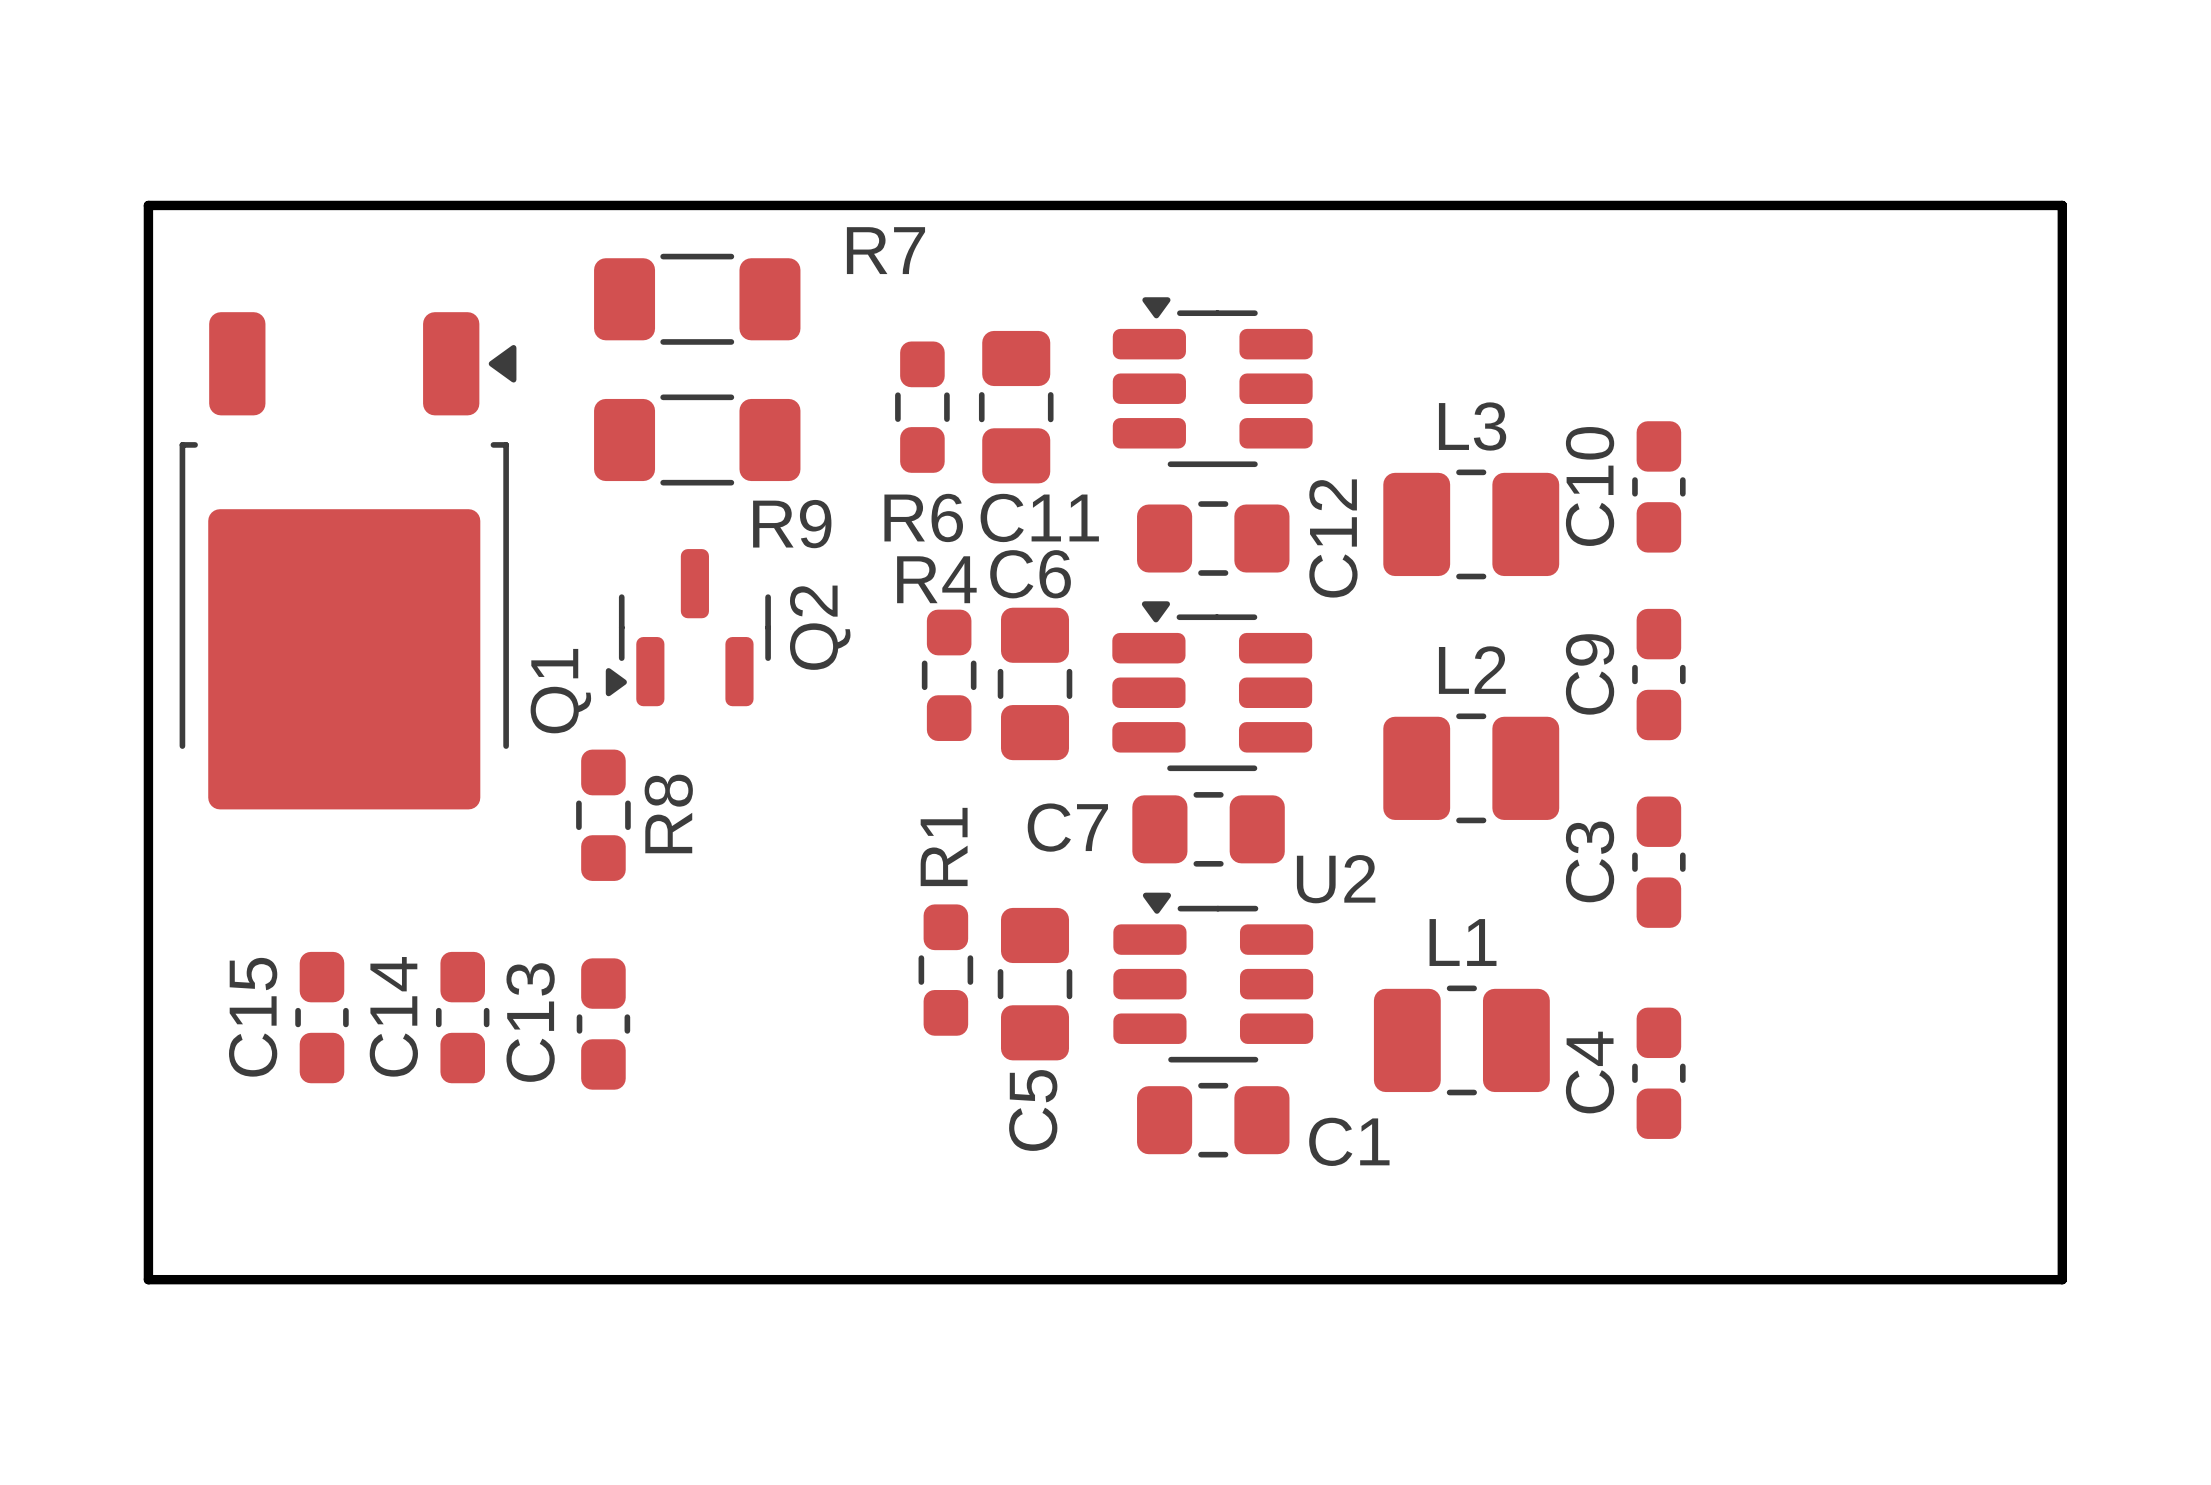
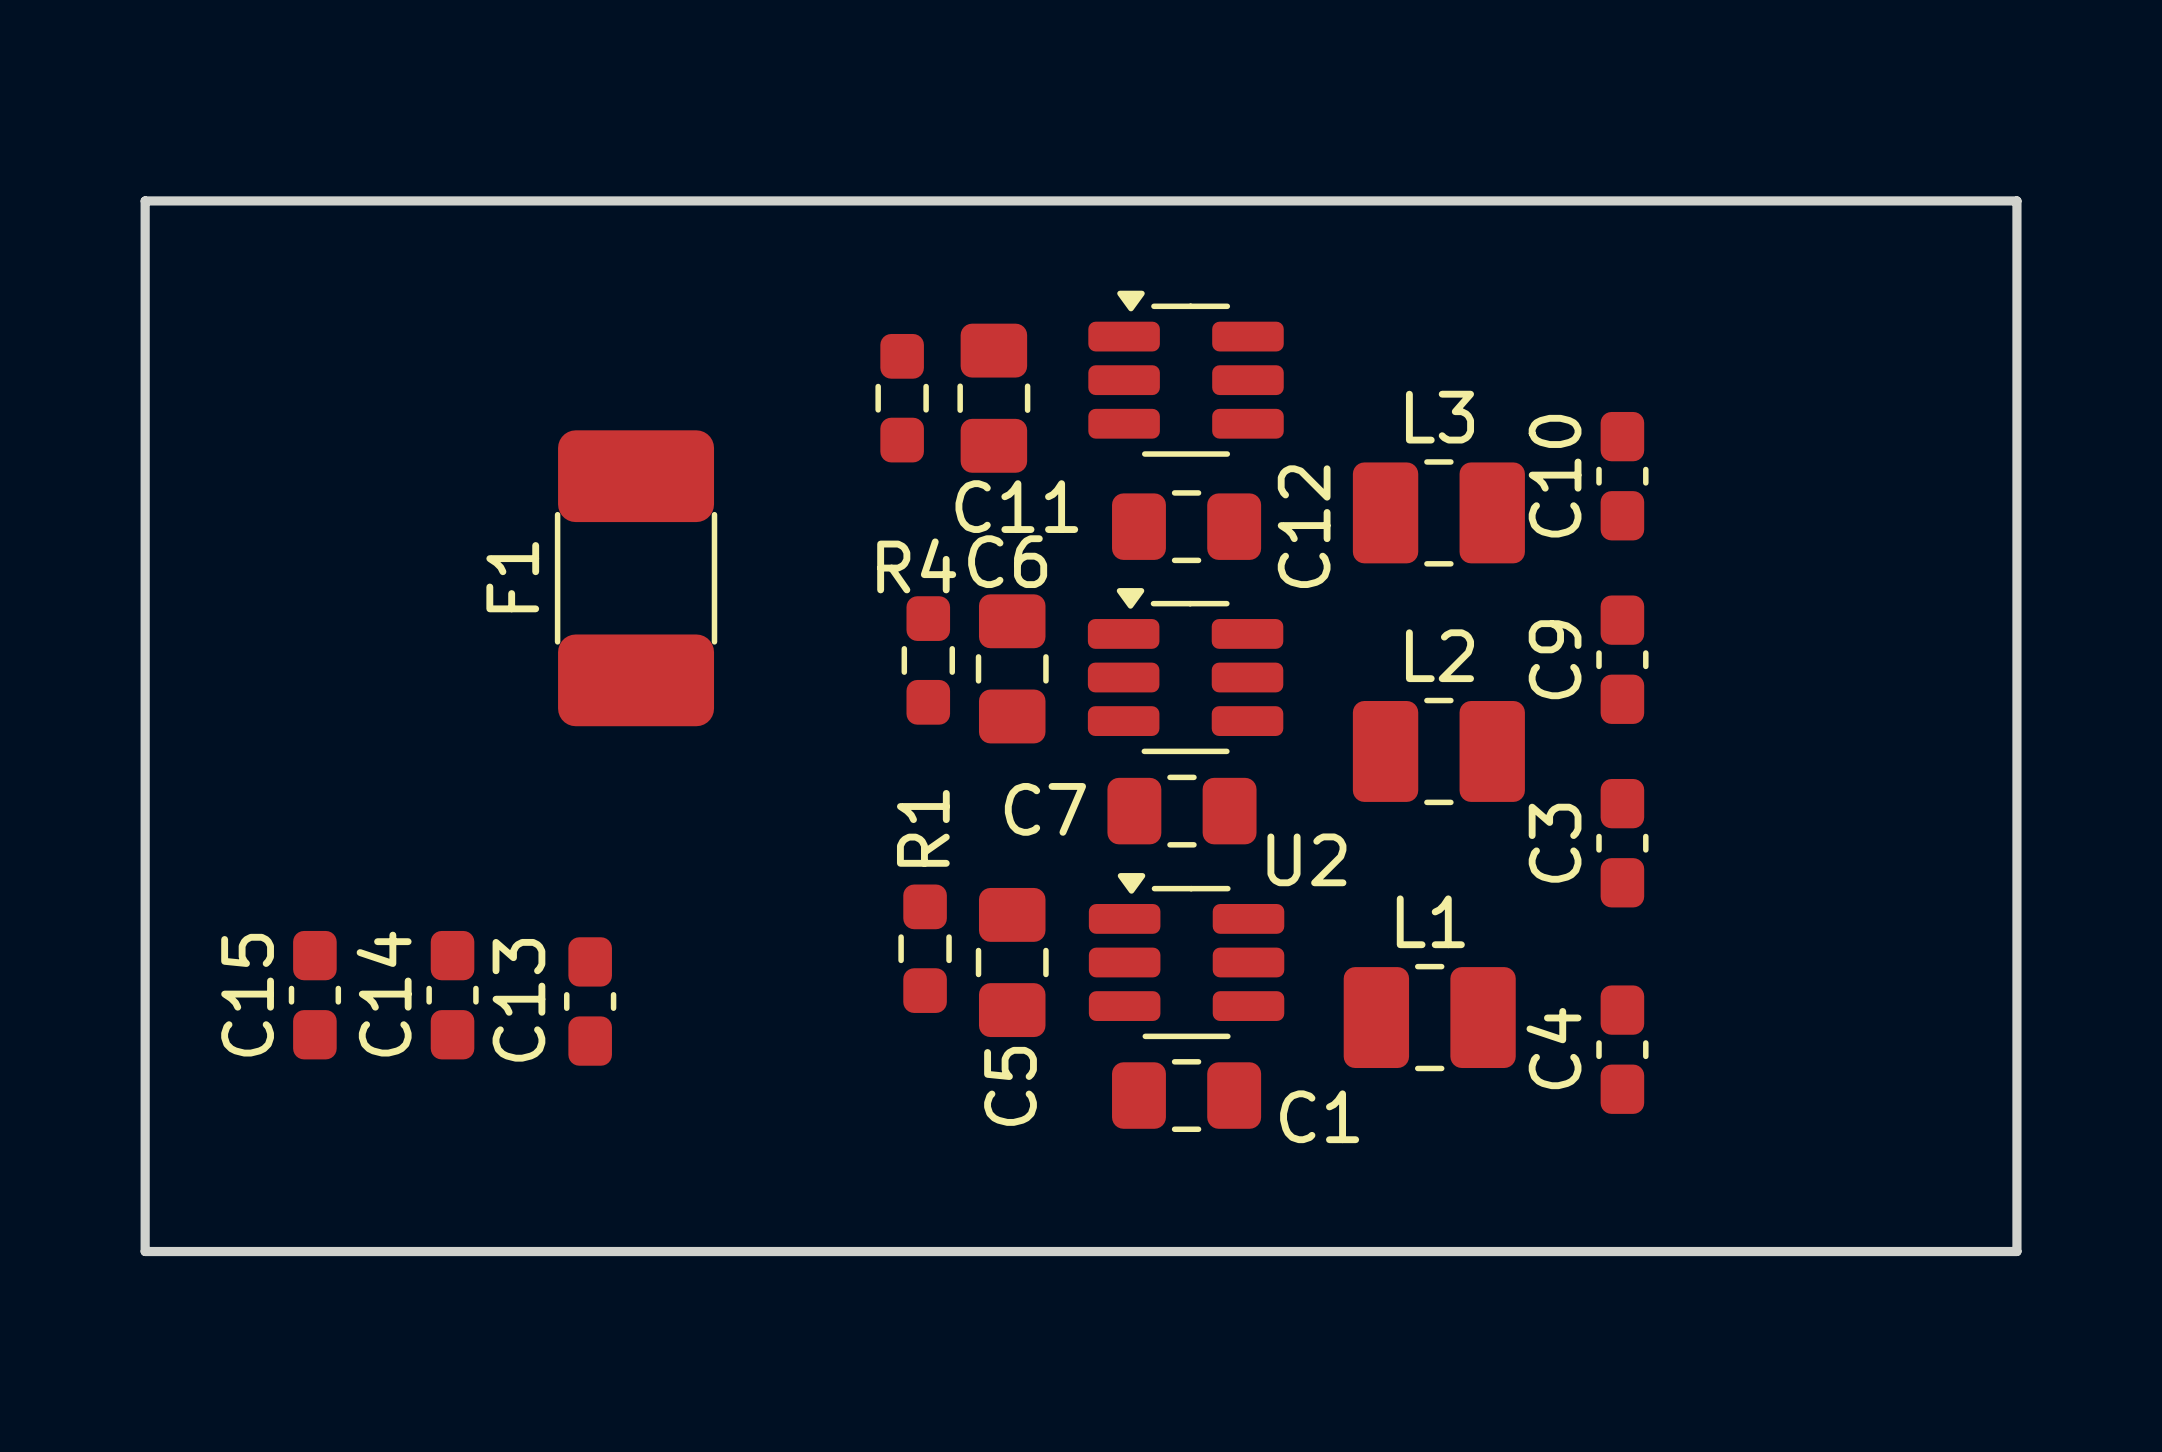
R7: (697, 299) -> none
R9: (697, 440) -> none
R6 name: R6 (923, 517) -> none
Q1: (348, 560) -> none
F1: none -> (636, 578)
Q2: (688, 627) -> none
R8: (603, 815) -> none

